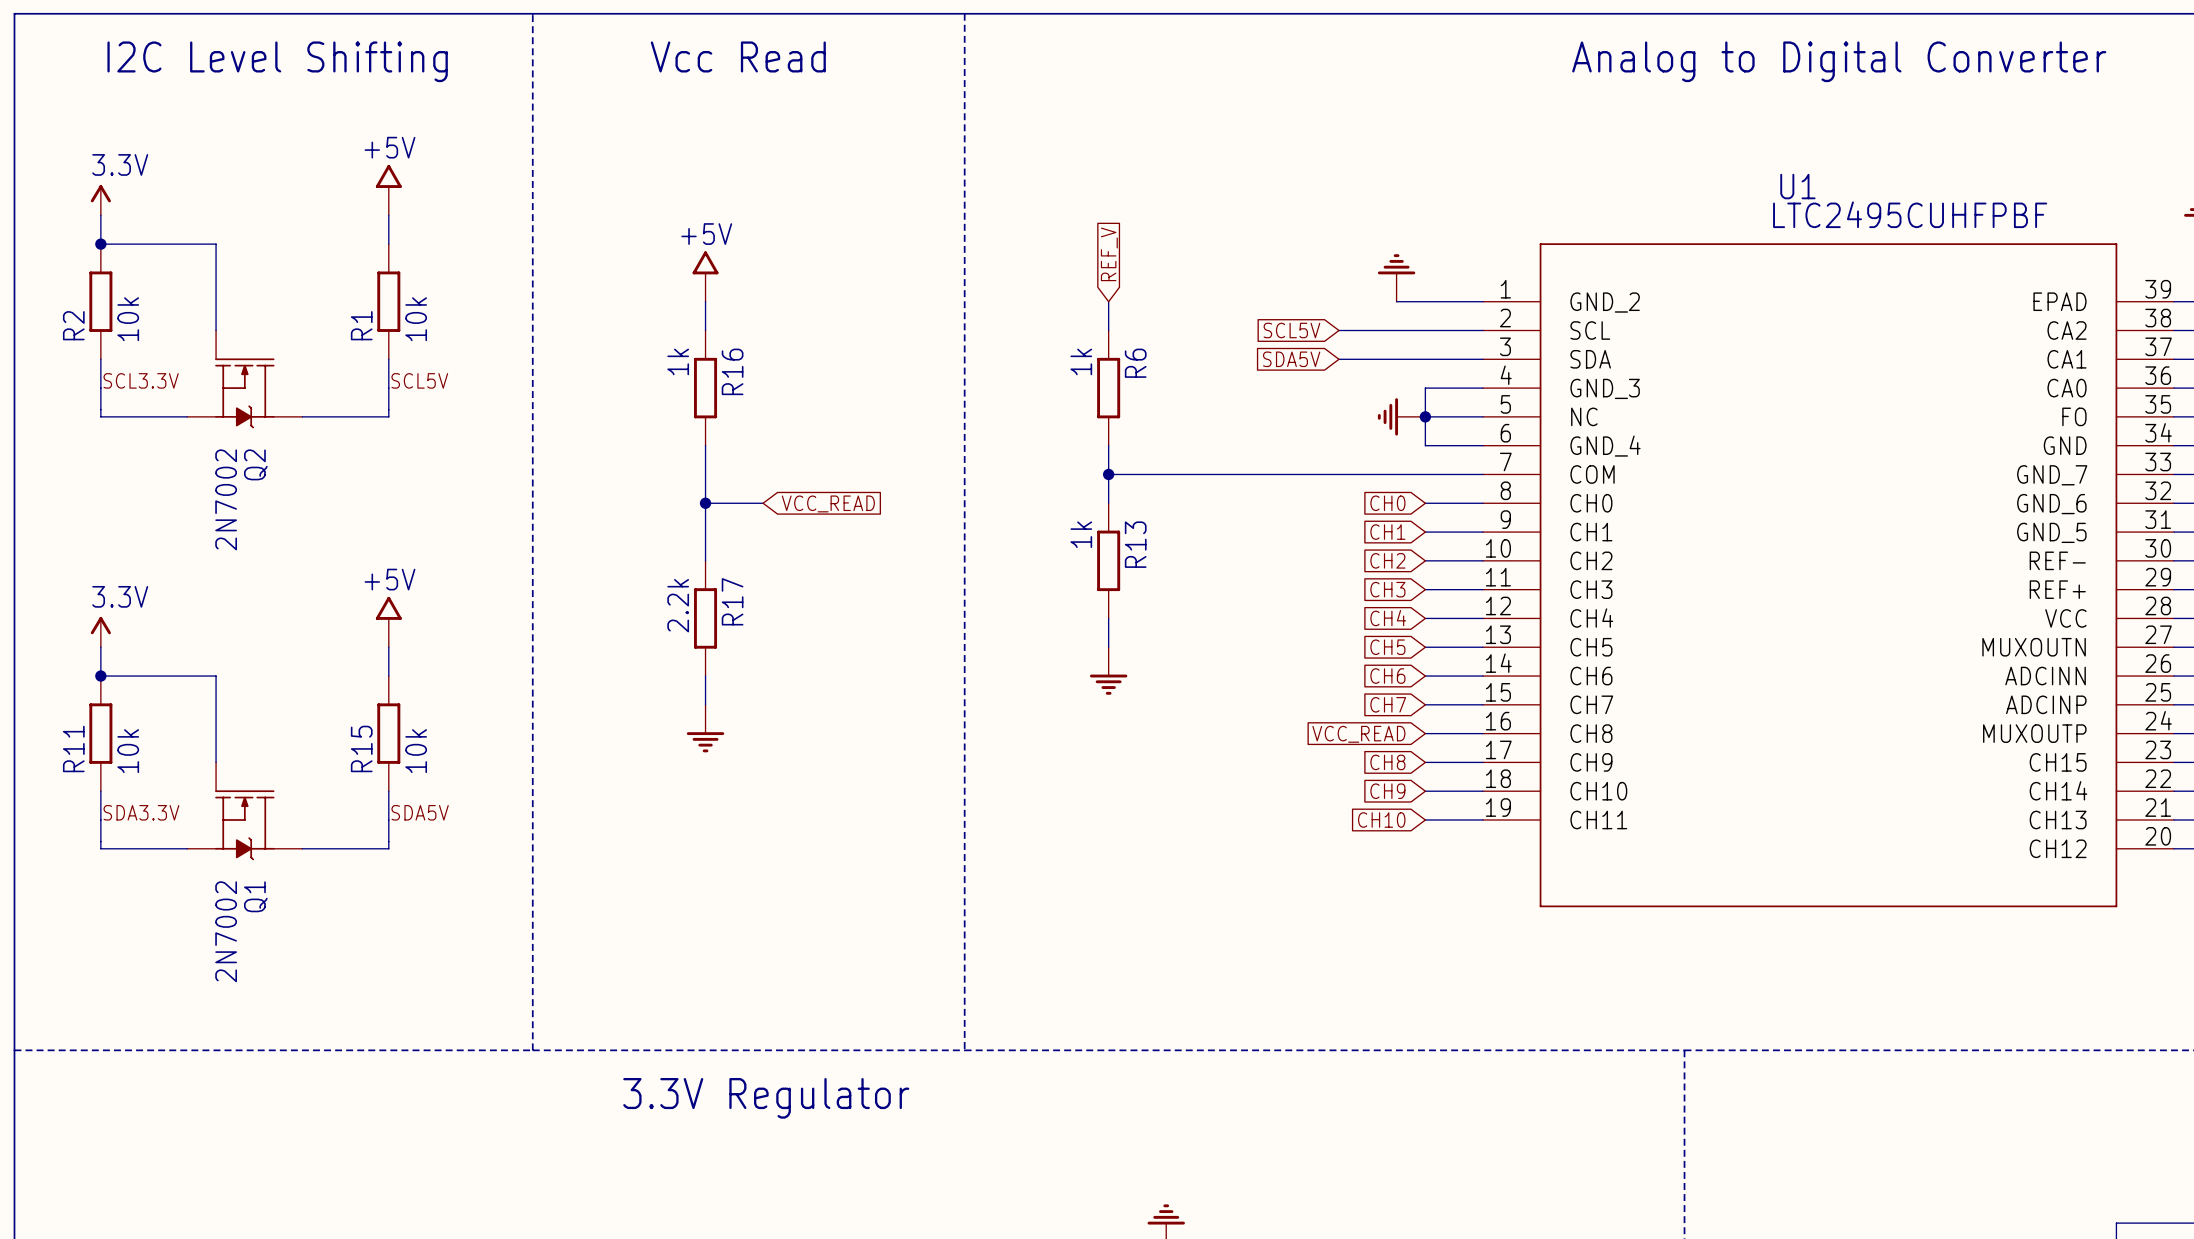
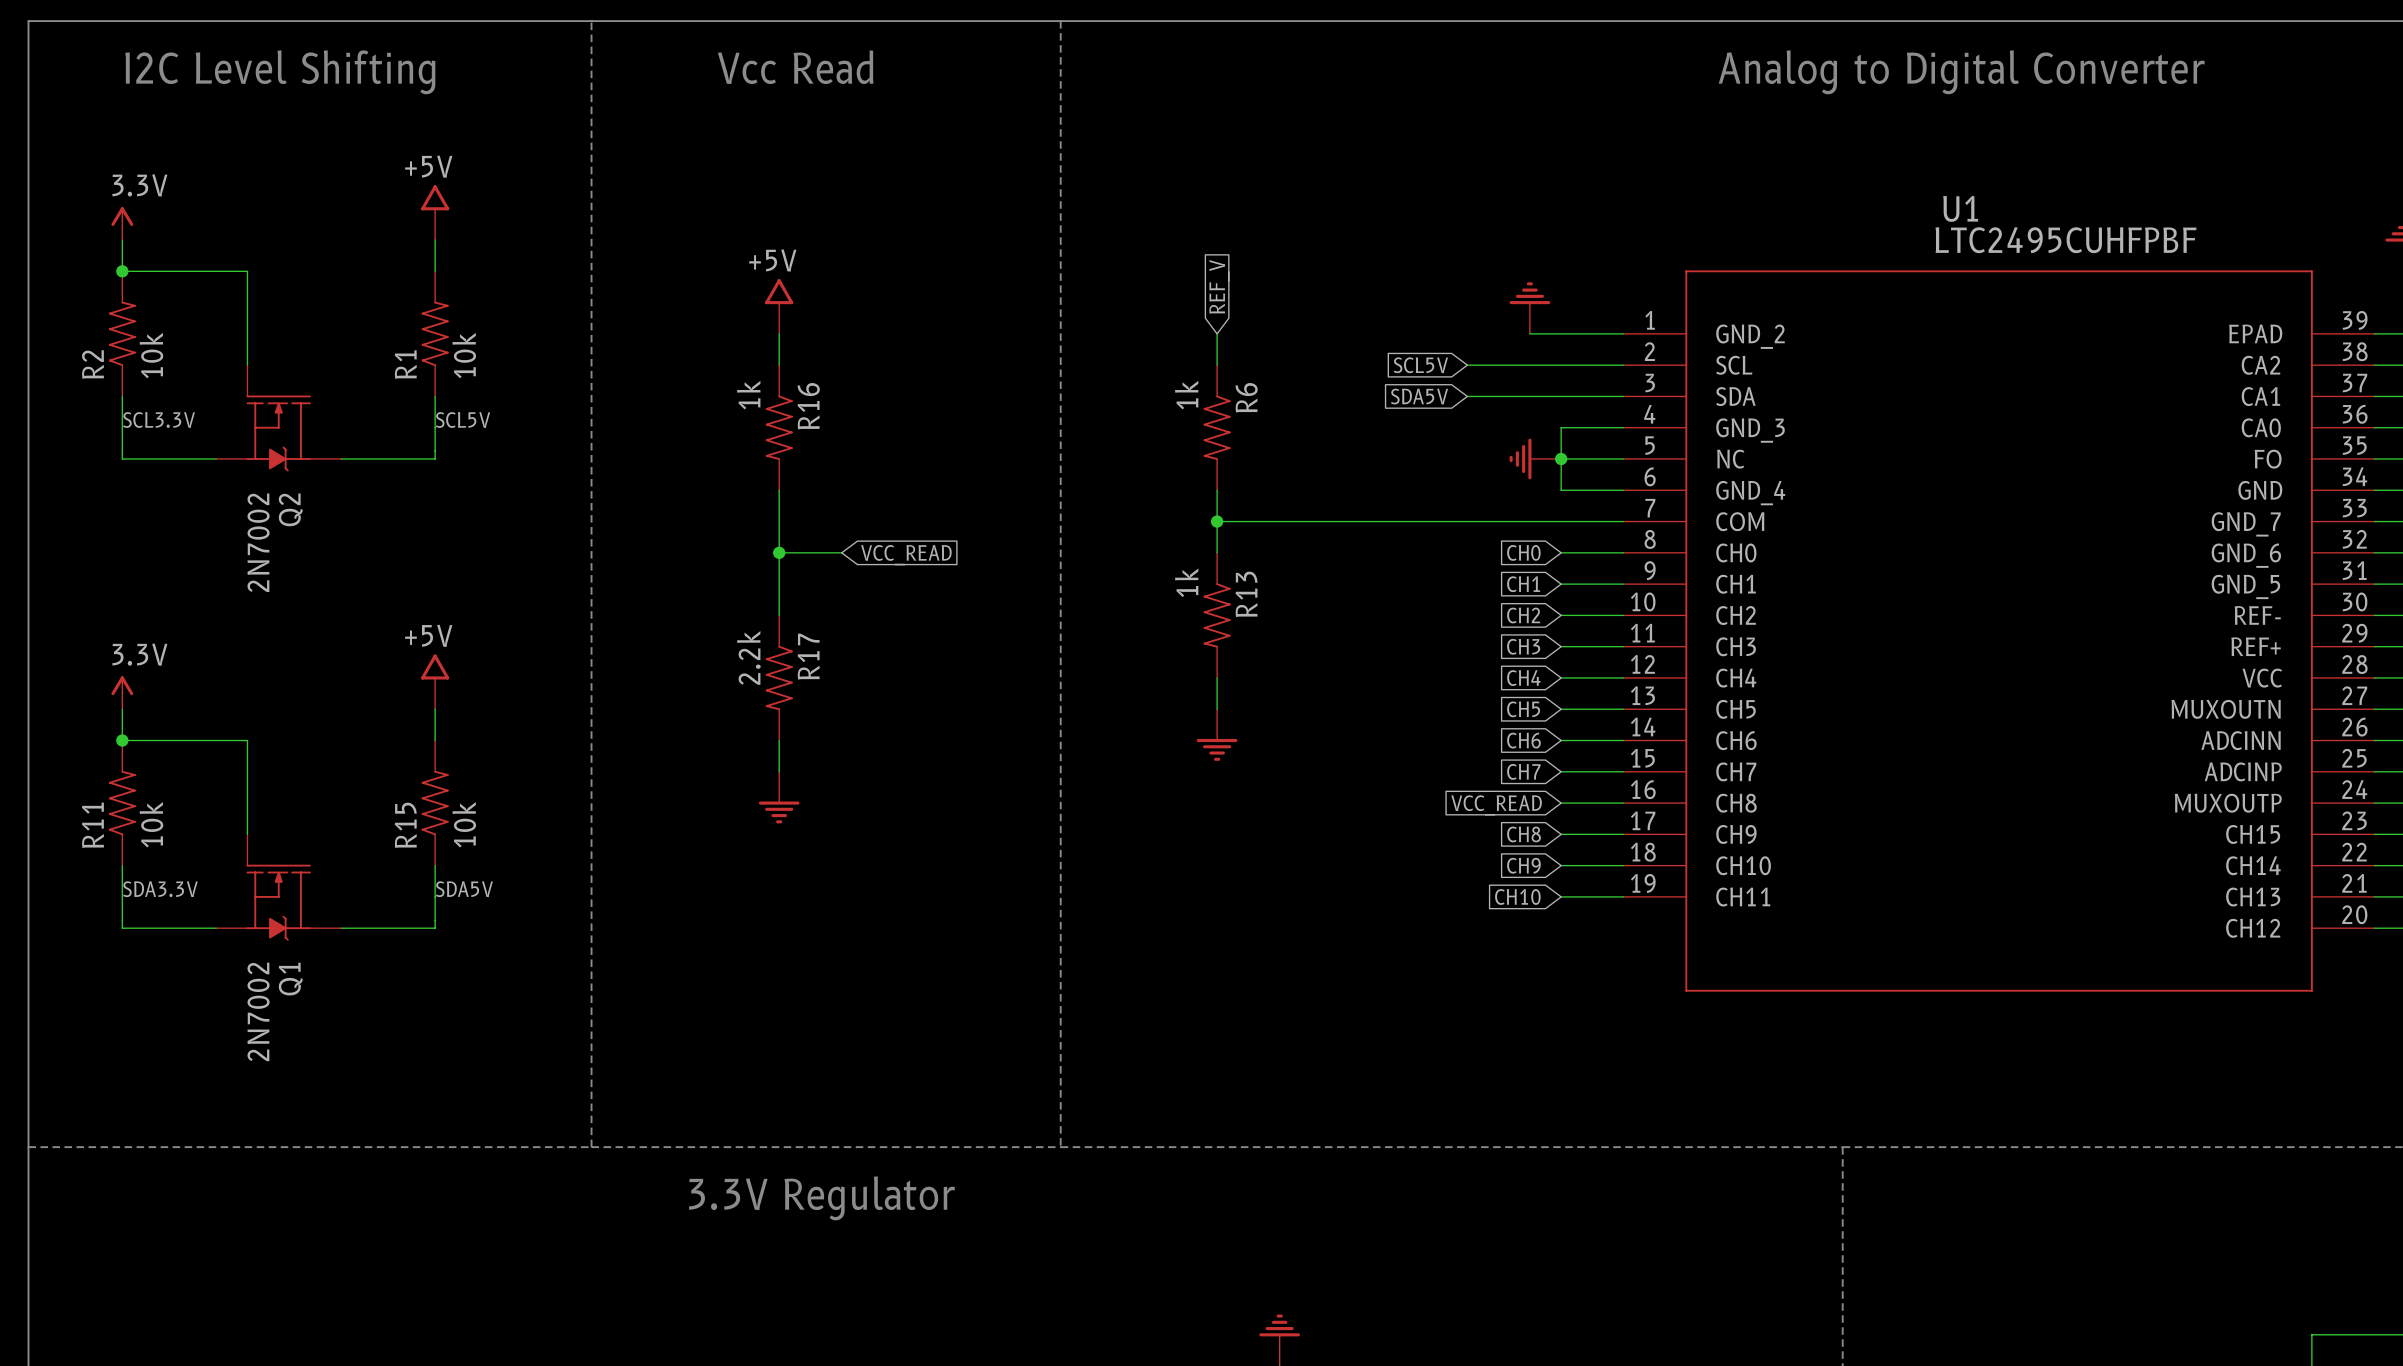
R2 symbol: [89, 244, 113, 360] -> [108, 271, 136, 397]
R1 symbol: [377, 244, 401, 360] -> [421, 271, 449, 397]
R16 symbol: [694, 330, 718, 446] -> [765, 365, 793, 491]
R6 symbol: [1097, 330, 1121, 446] -> [1203, 365, 1231, 491]
R13 symbol: [1097, 503, 1121, 619] -> [1203, 552, 1231, 678]
R17 symbol: [694, 560, 718, 677] -> [765, 615, 793, 741]
R11 symbol: [89, 676, 113, 792] -> [108, 740, 136, 866]
R15 symbol: [377, 676, 401, 792] -> [421, 740, 449, 866]

